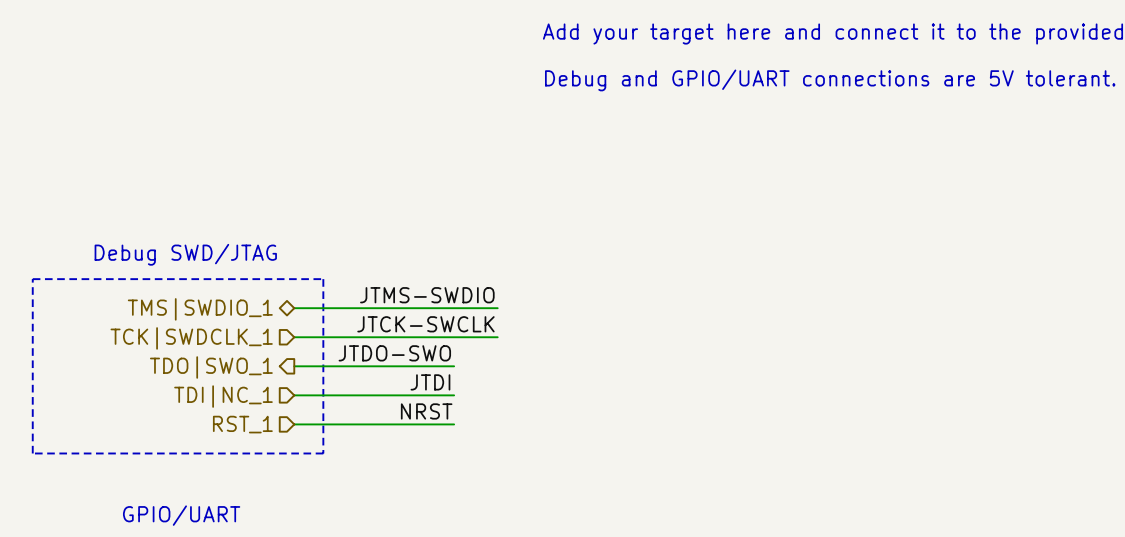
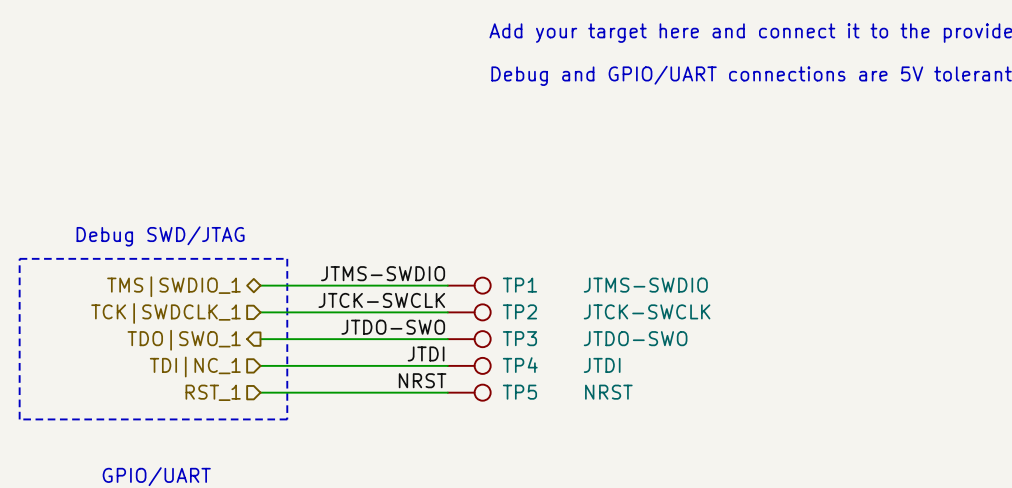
TP1: none -> JTMS-SWDIO (469, 285)
TP2: none -> JTCK-SWCLK (469, 312)
label position: JTDO-SWO (394, 353) -> JTDO-SWO (393, 327)
wire: none -> (407, 339) (447, 339)
TP3: none -> JTDO-SWO (469, 339)
label position: JTDI (430, 382) -> JTDI (426, 353)
wire: none -> (407, 365) (447, 365)
TP4: none -> JTDI (469, 365)
label position: NRST (426, 411) -> NRST (422, 380)
wire: none -> (407, 392) (447, 392)
TP5: none -> NRST (469, 392)

